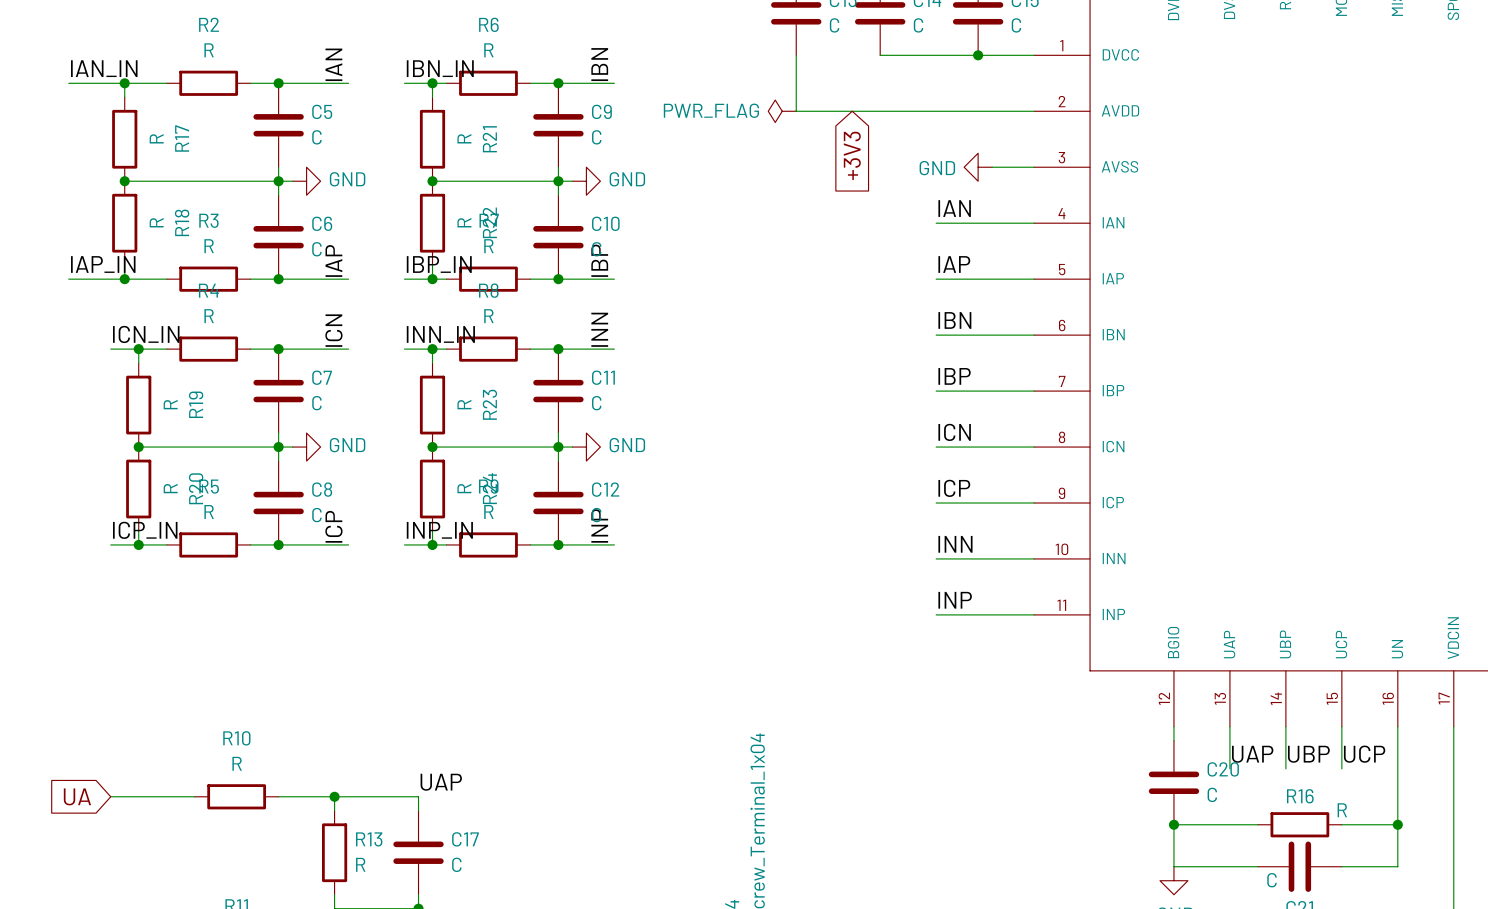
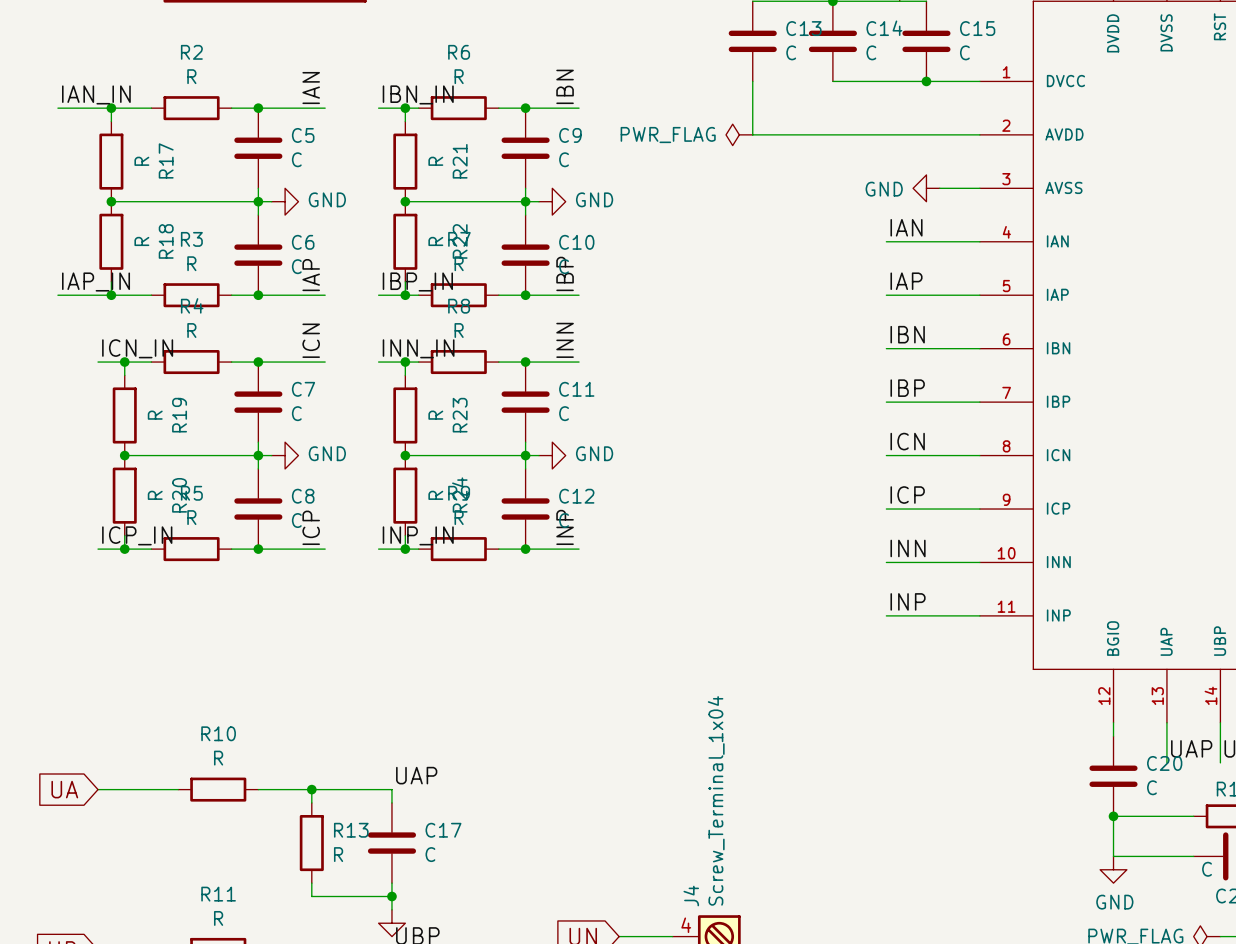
global label: +3V3 (852, 155) -> none

